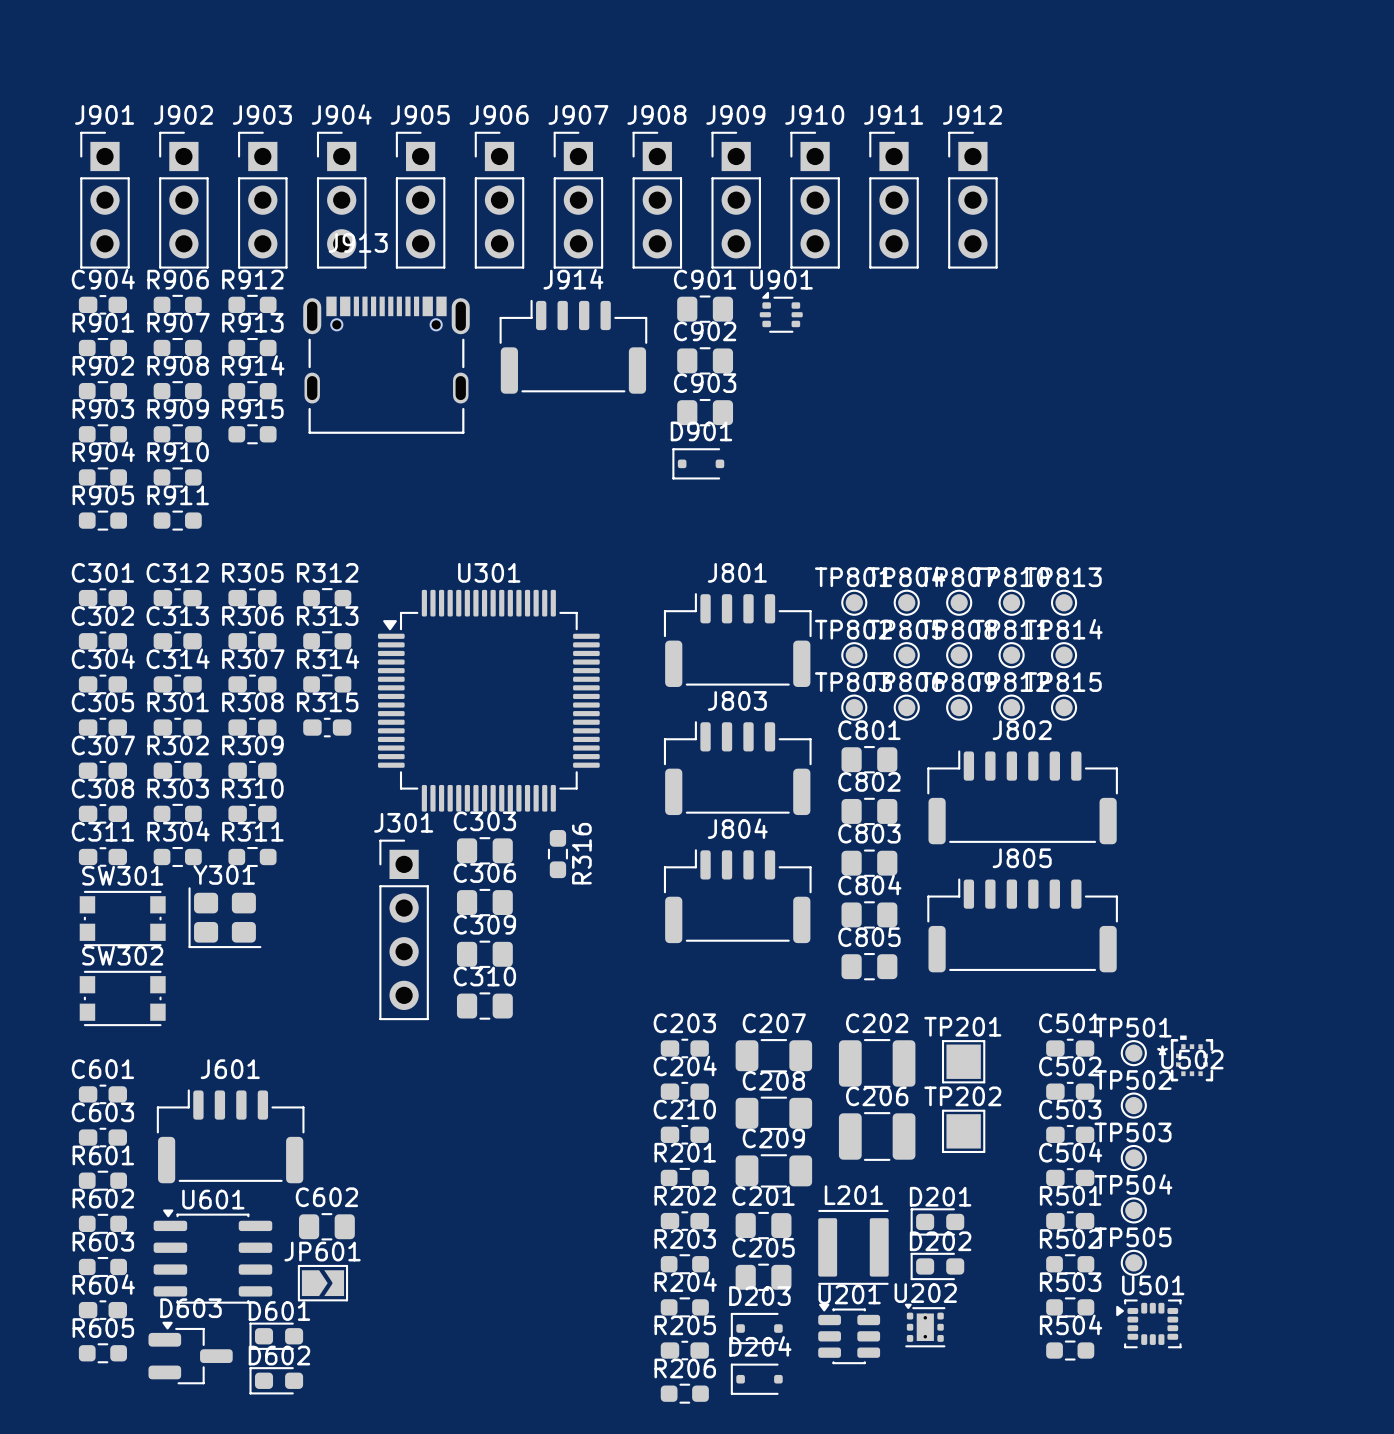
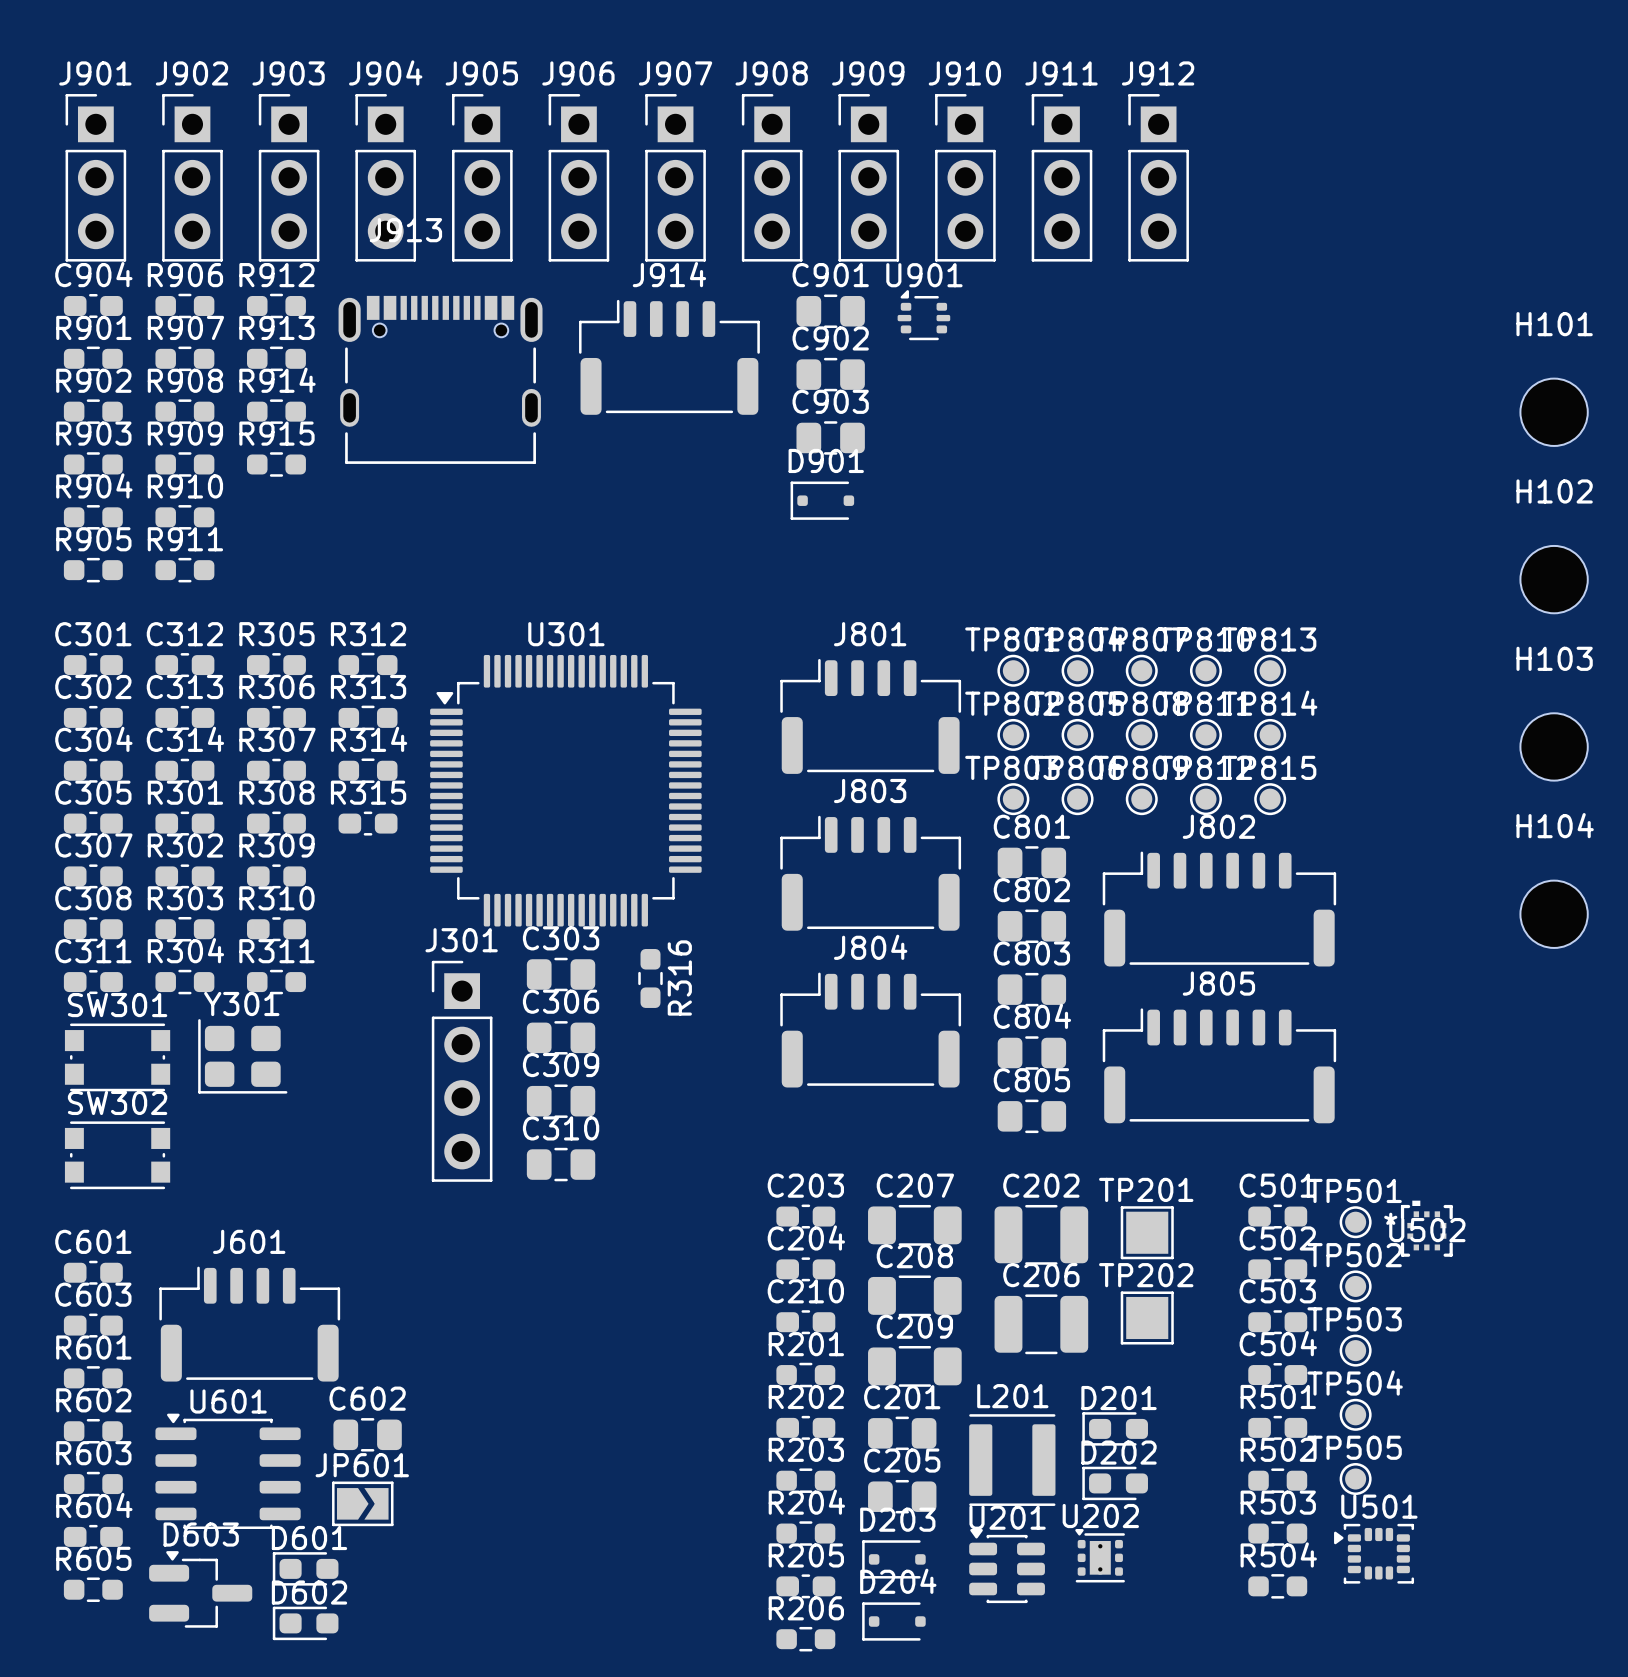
H101: none -> (1554, 412)
H102: none -> (1554, 579)
H103: none -> (1554, 746)
H104: none -> (1554, 914)

